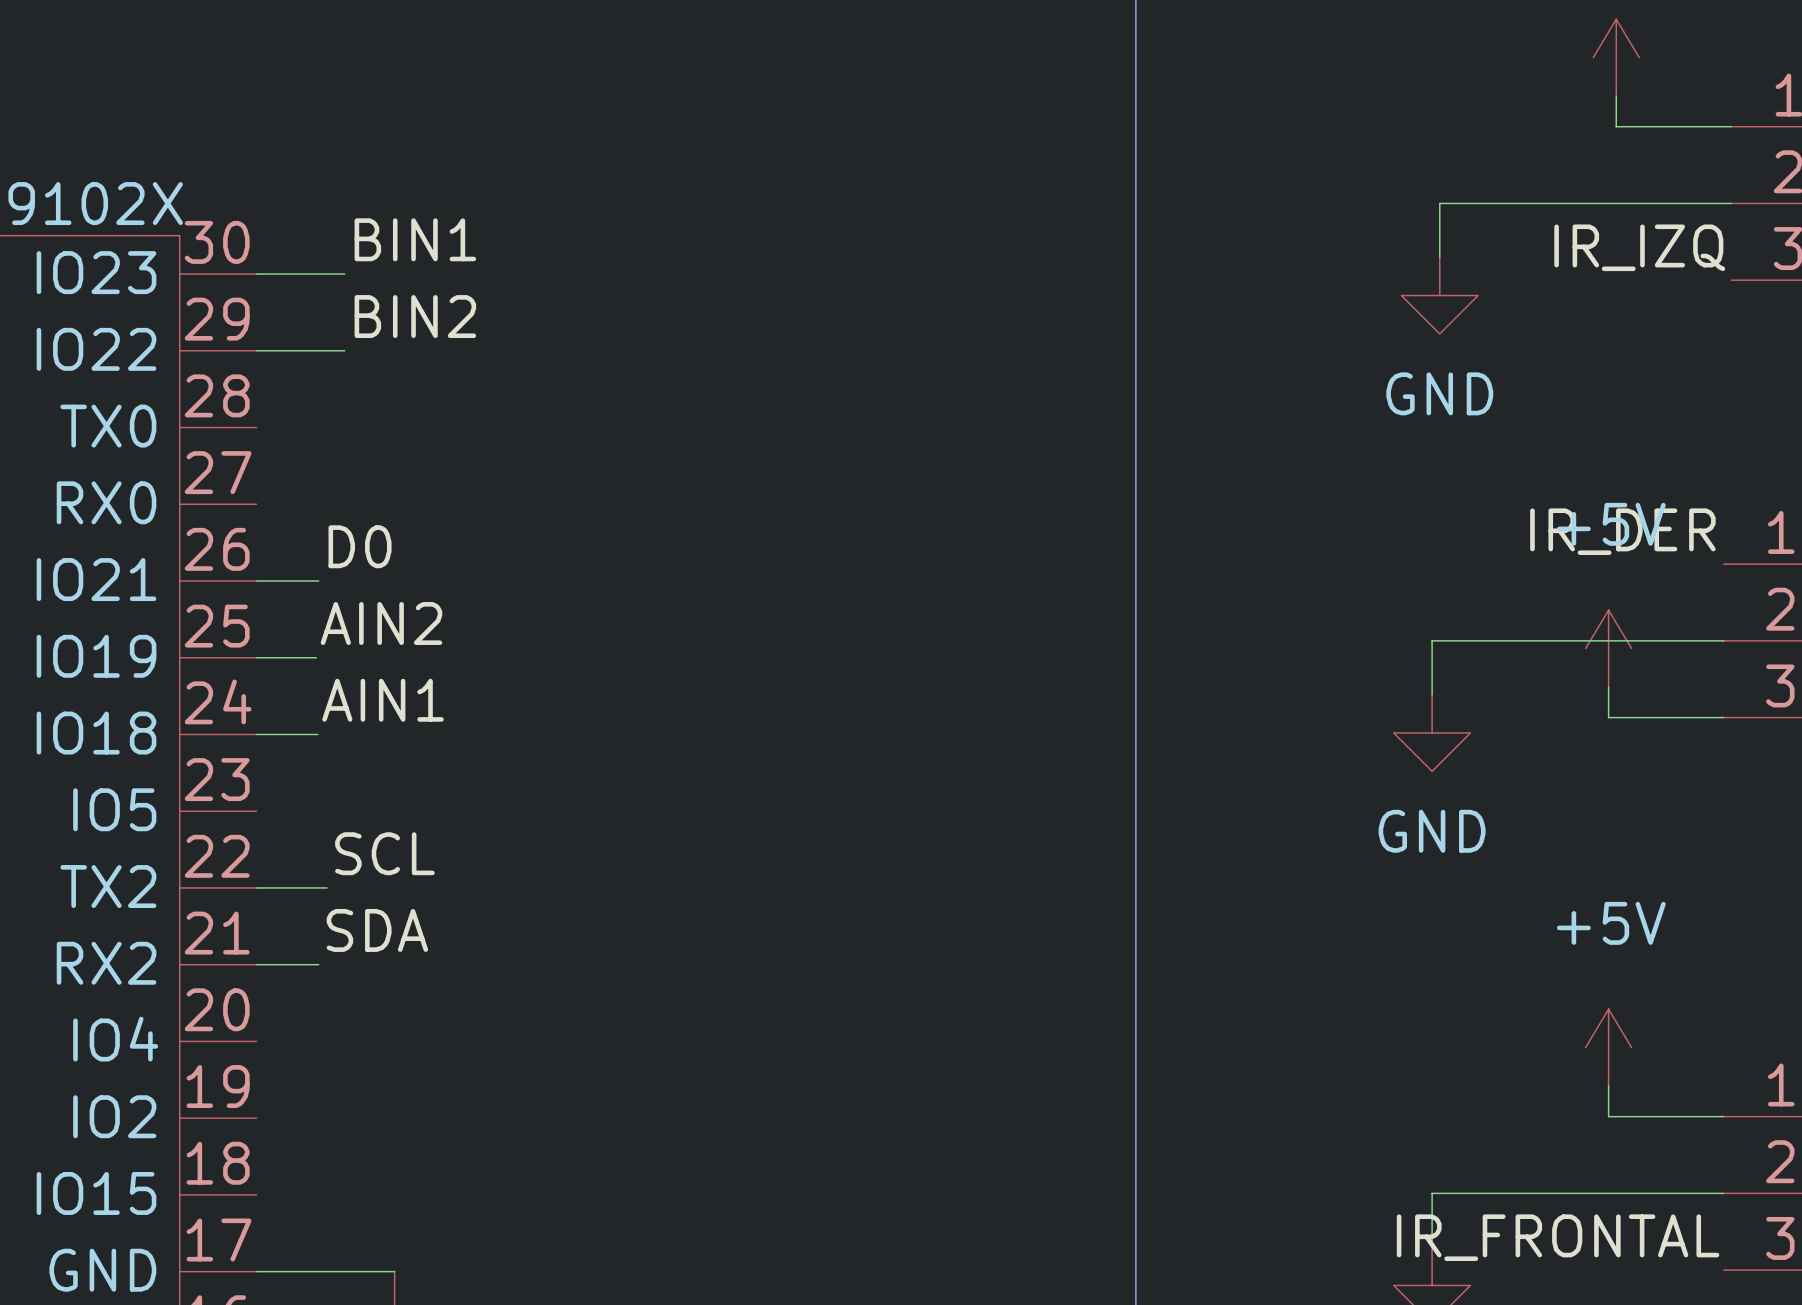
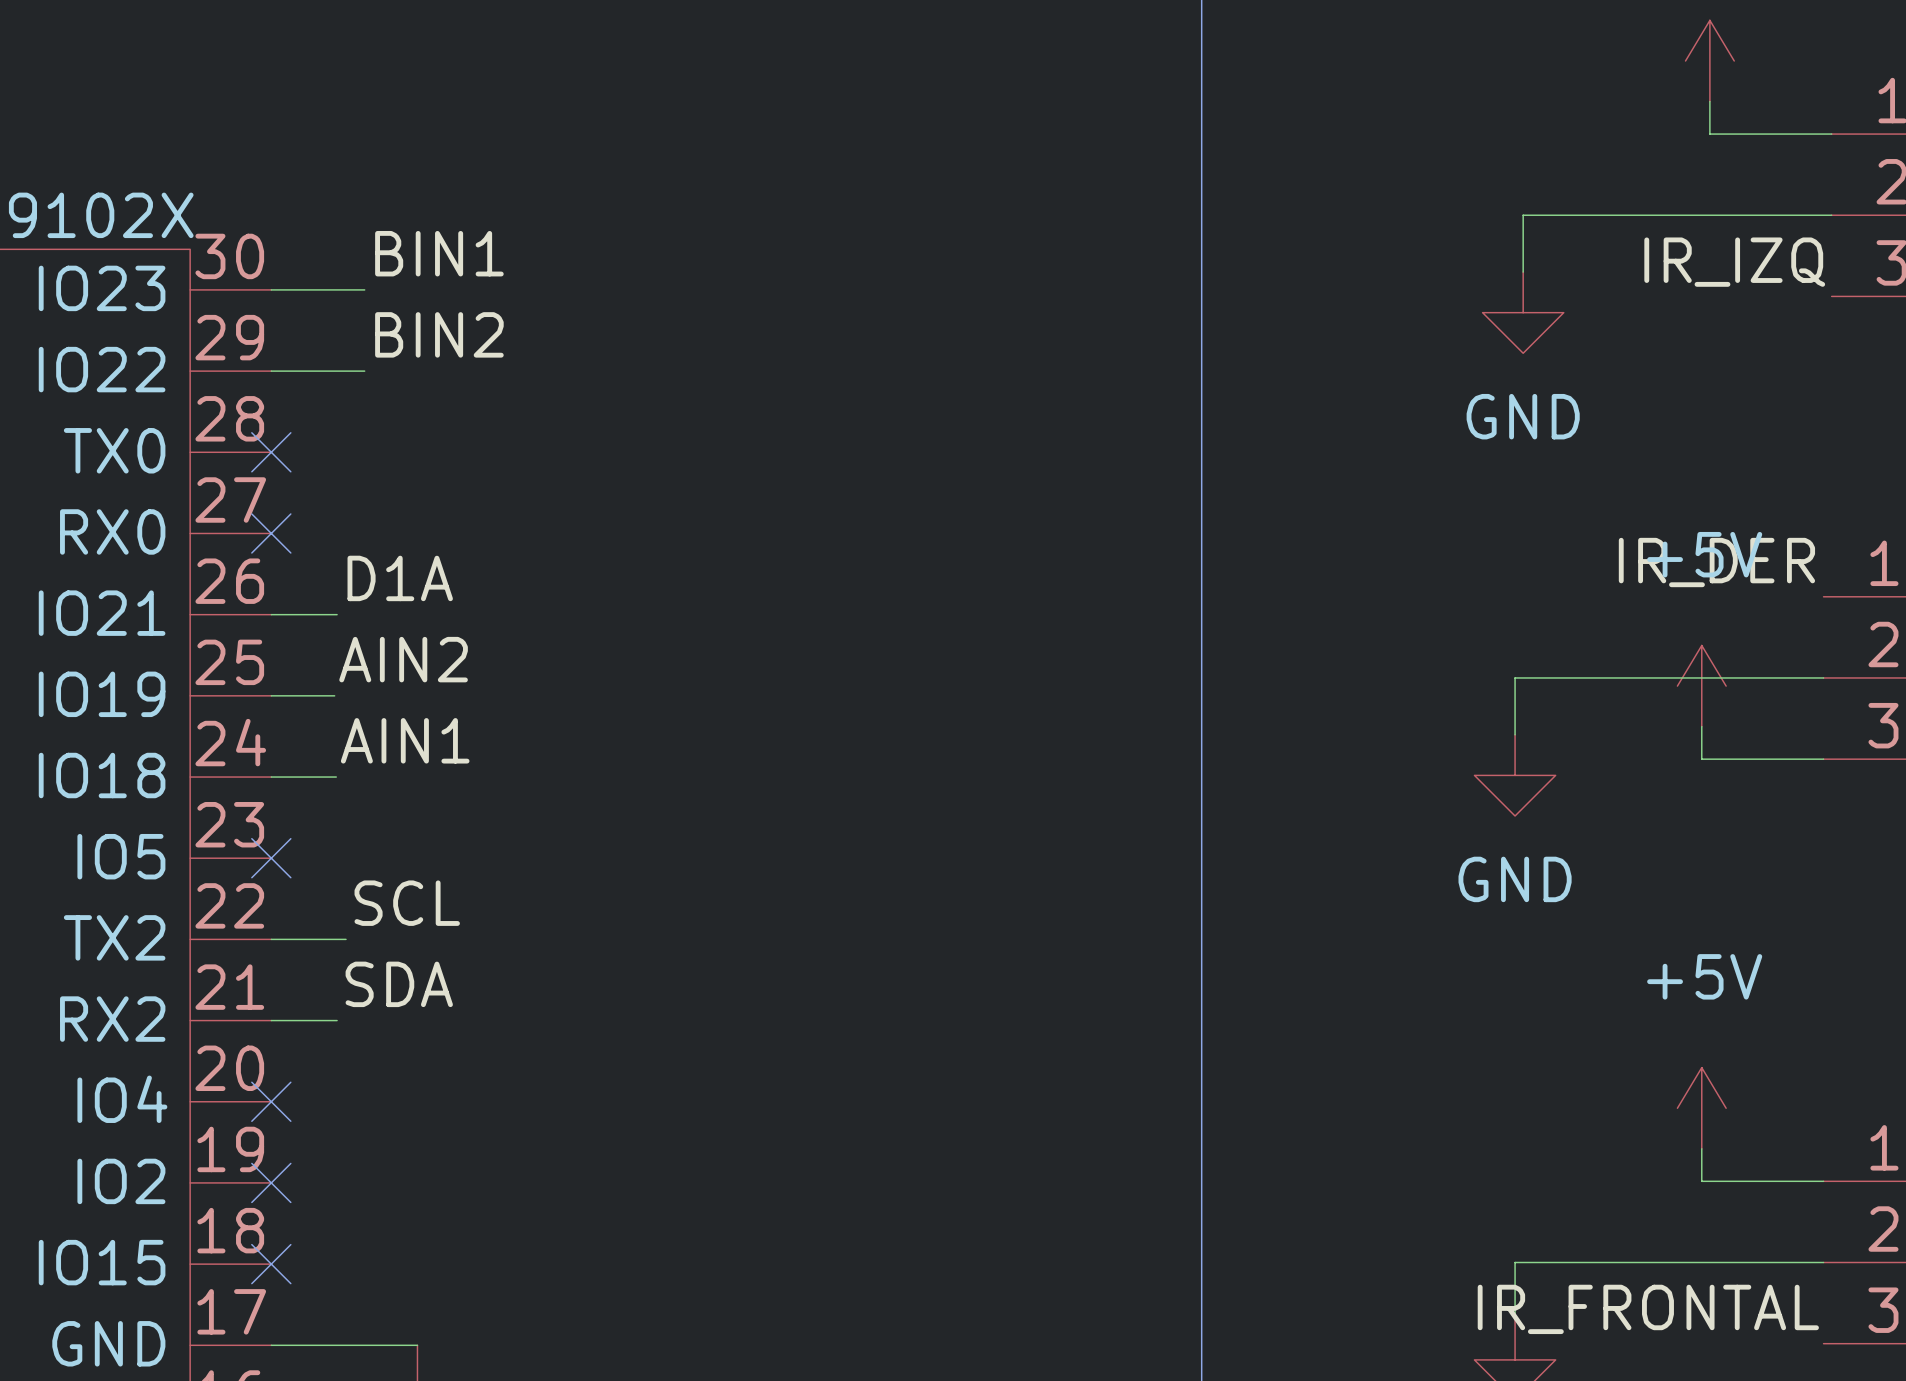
no-connect mark: none -> (271, 452)
no-connect mark: none -> (271, 533)
label: D0 (360, 546) -> D1A (400, 578)
no-connect mark: none -> (271, 858)
no-connect mark: none -> (271, 1101)
no-connect mark: none -> (271, 1182)
no-connect mark: none -> (271, 1264)

